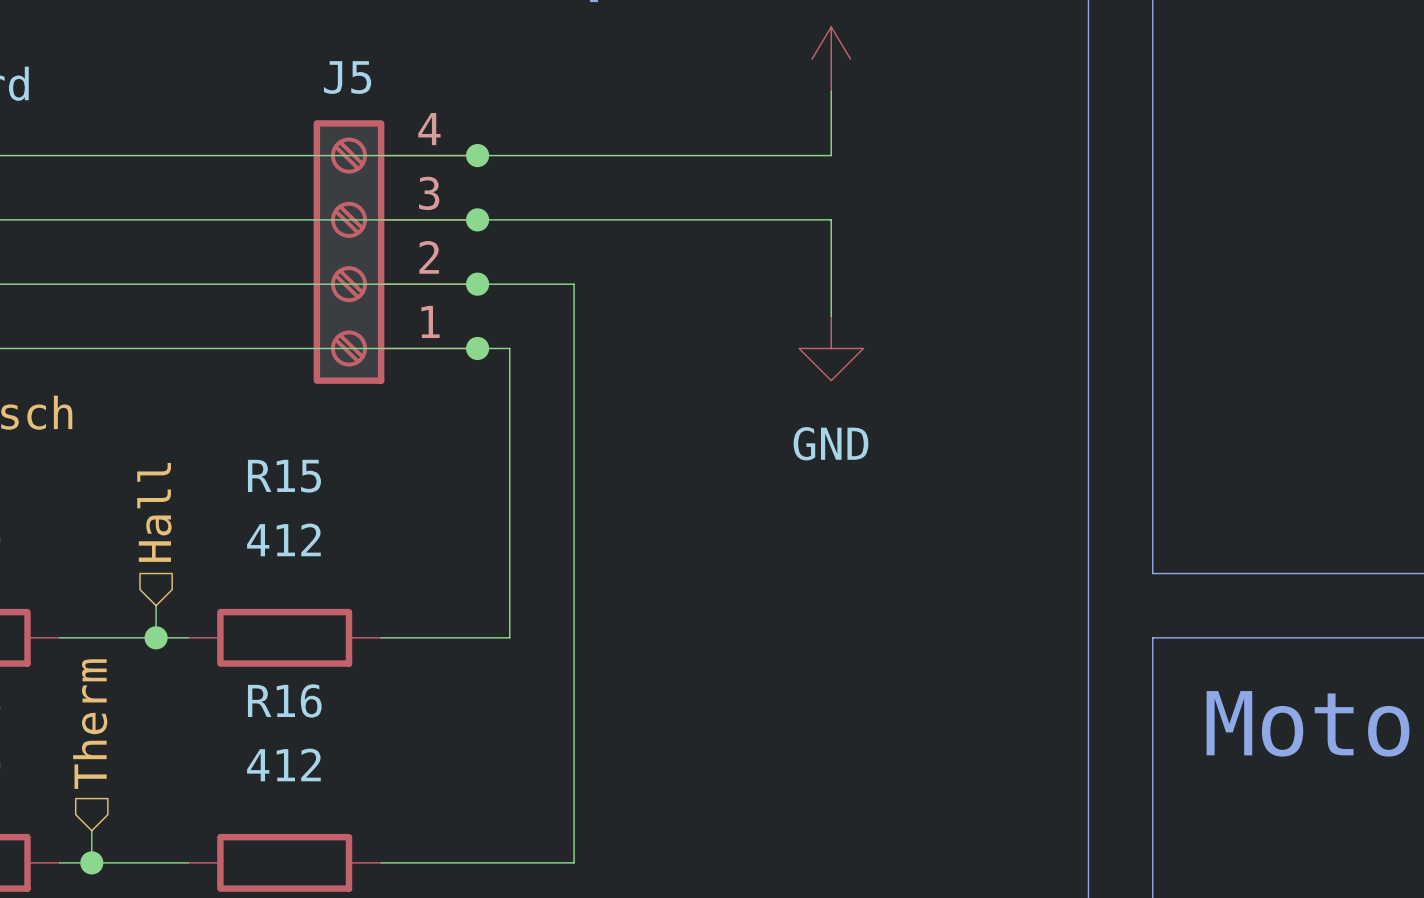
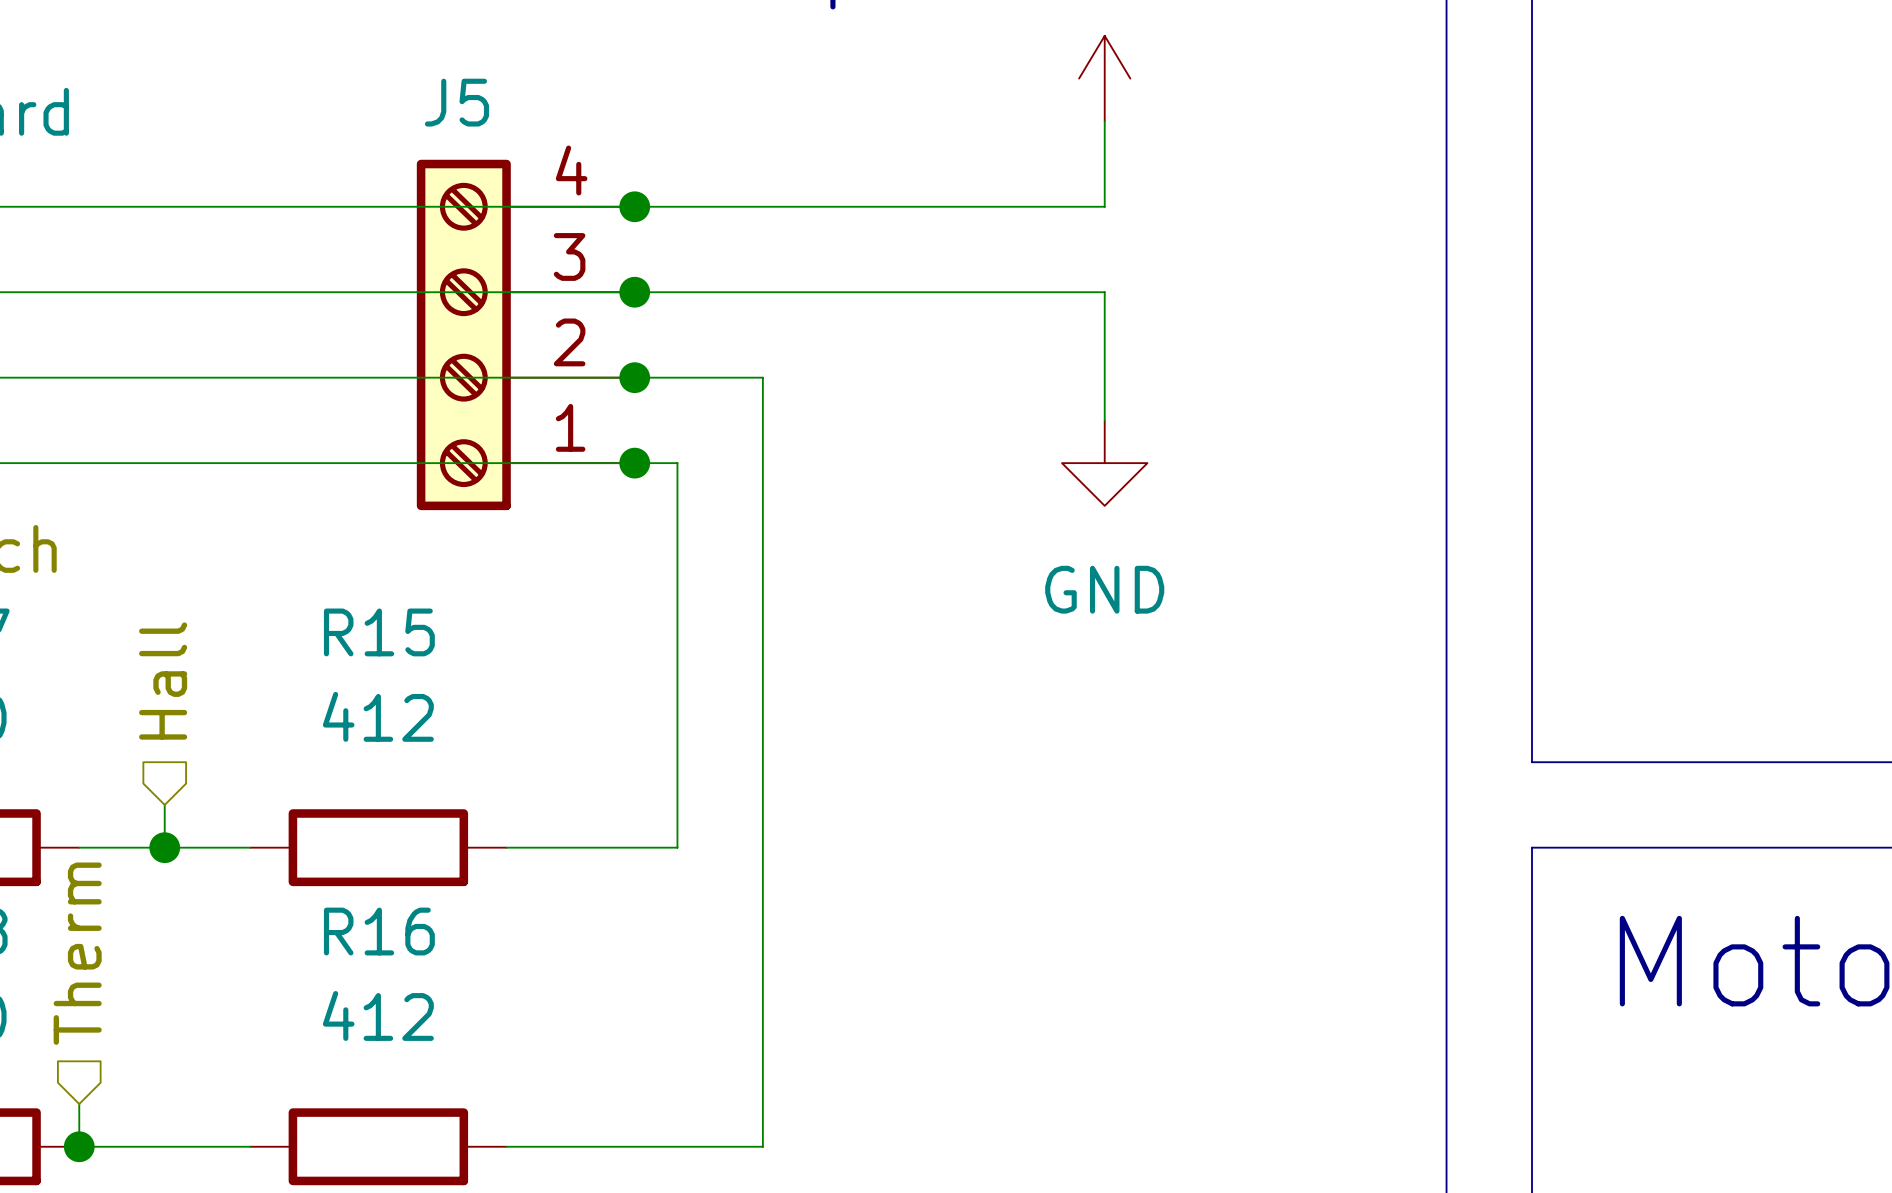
hierarchical label position: Hall (154, 512) -> Hall (163, 681)
wire: (156, 605) (156, 637) -> (164, 804) (164, 847)
junction position: (156, 637) -> (164, 847)
hierarchical label position: Therm (90, 724) -> Therm (77, 953)
wire: (91, 830) (91, 862) -> (79, 1104) (79, 1146)
junction position: (91, 862) -> (79, 1146)

